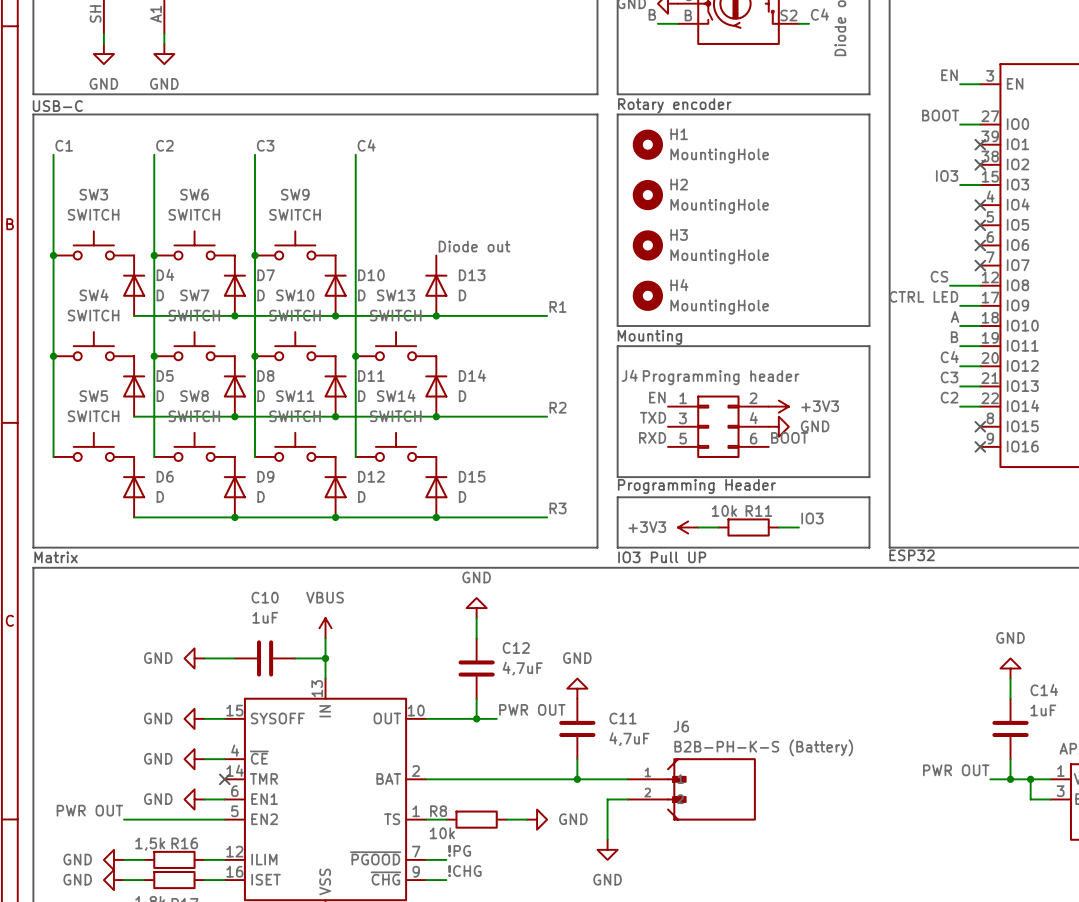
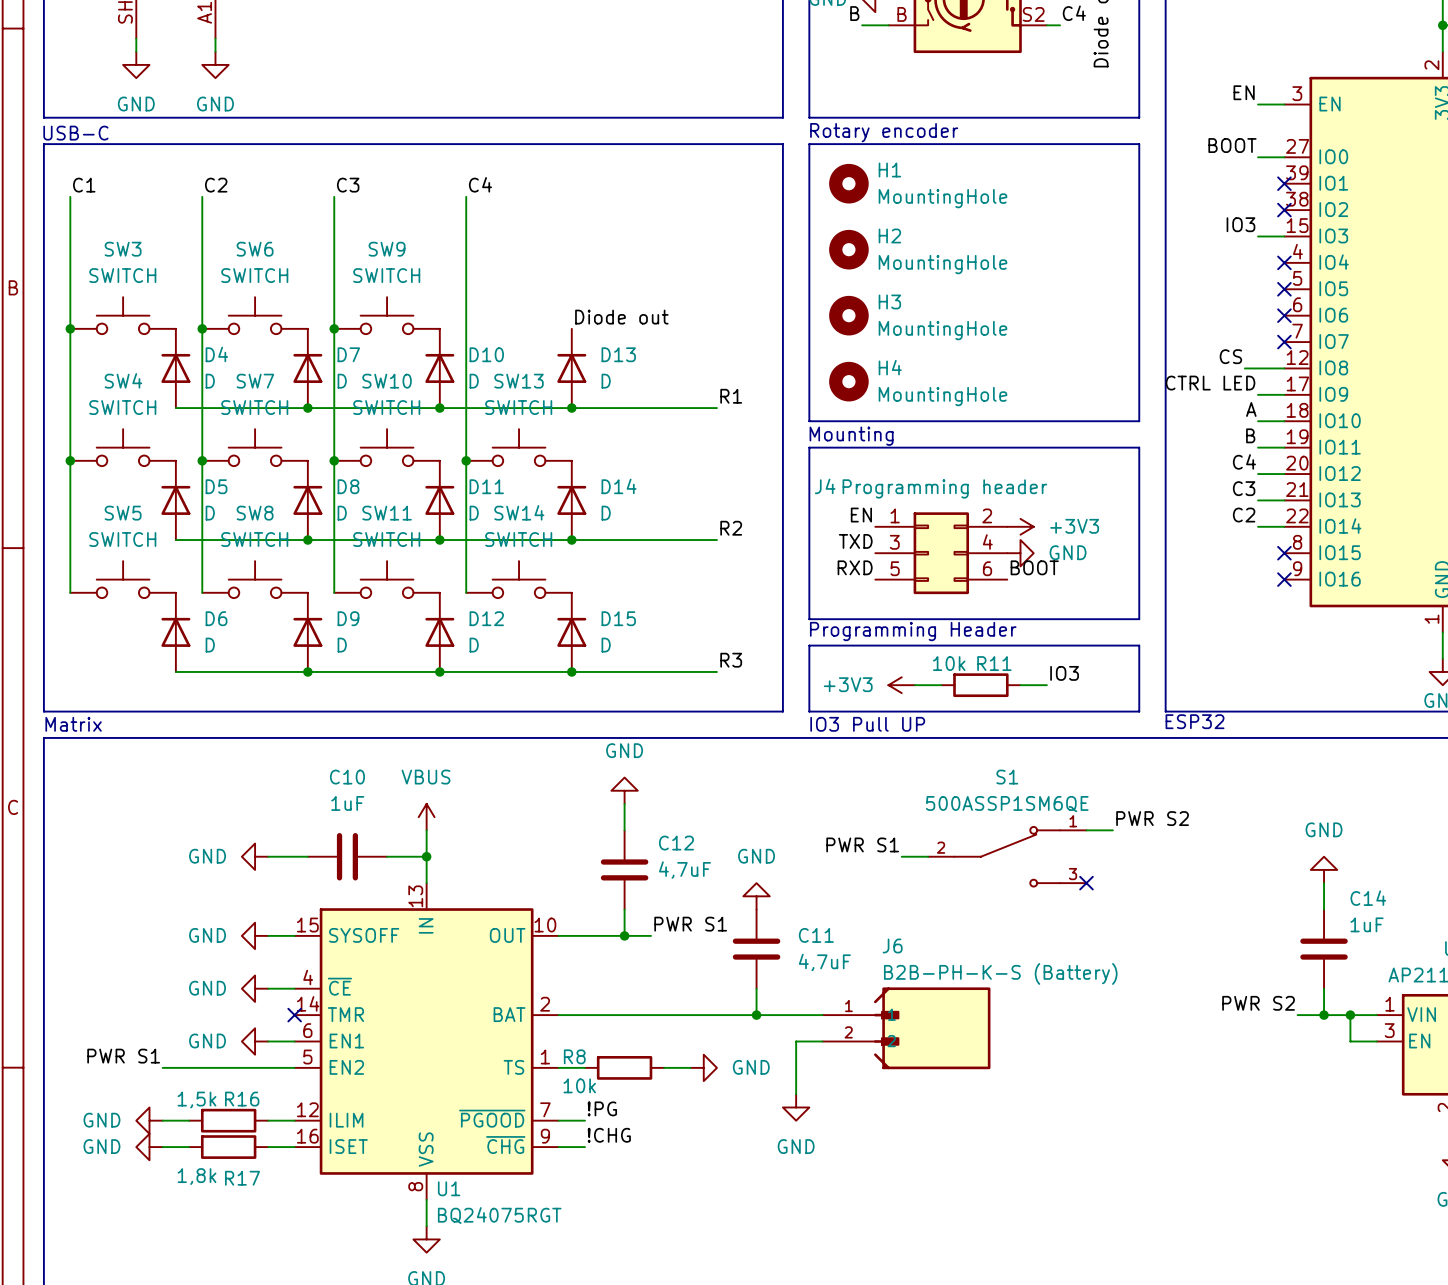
label: none -> PWR S2 (1152, 818)
wire: none -> (1086, 830) (1112, 830)
label: none -> PWR S1 (862, 844)
wire: none -> (901, 856) (928, 856)
S1: none -> 500ASSP1SM6QE (1007, 856)
no-connect mark: none -> (1086, 883)
label: PWR OUT (532, 709) -> PWR S1 (690, 924)
label: PWR OUT (956, 770) -> PWR S2 (1258, 1003)
label: PWR OUT (89, 810) -> PWR S1 (123, 1056)

